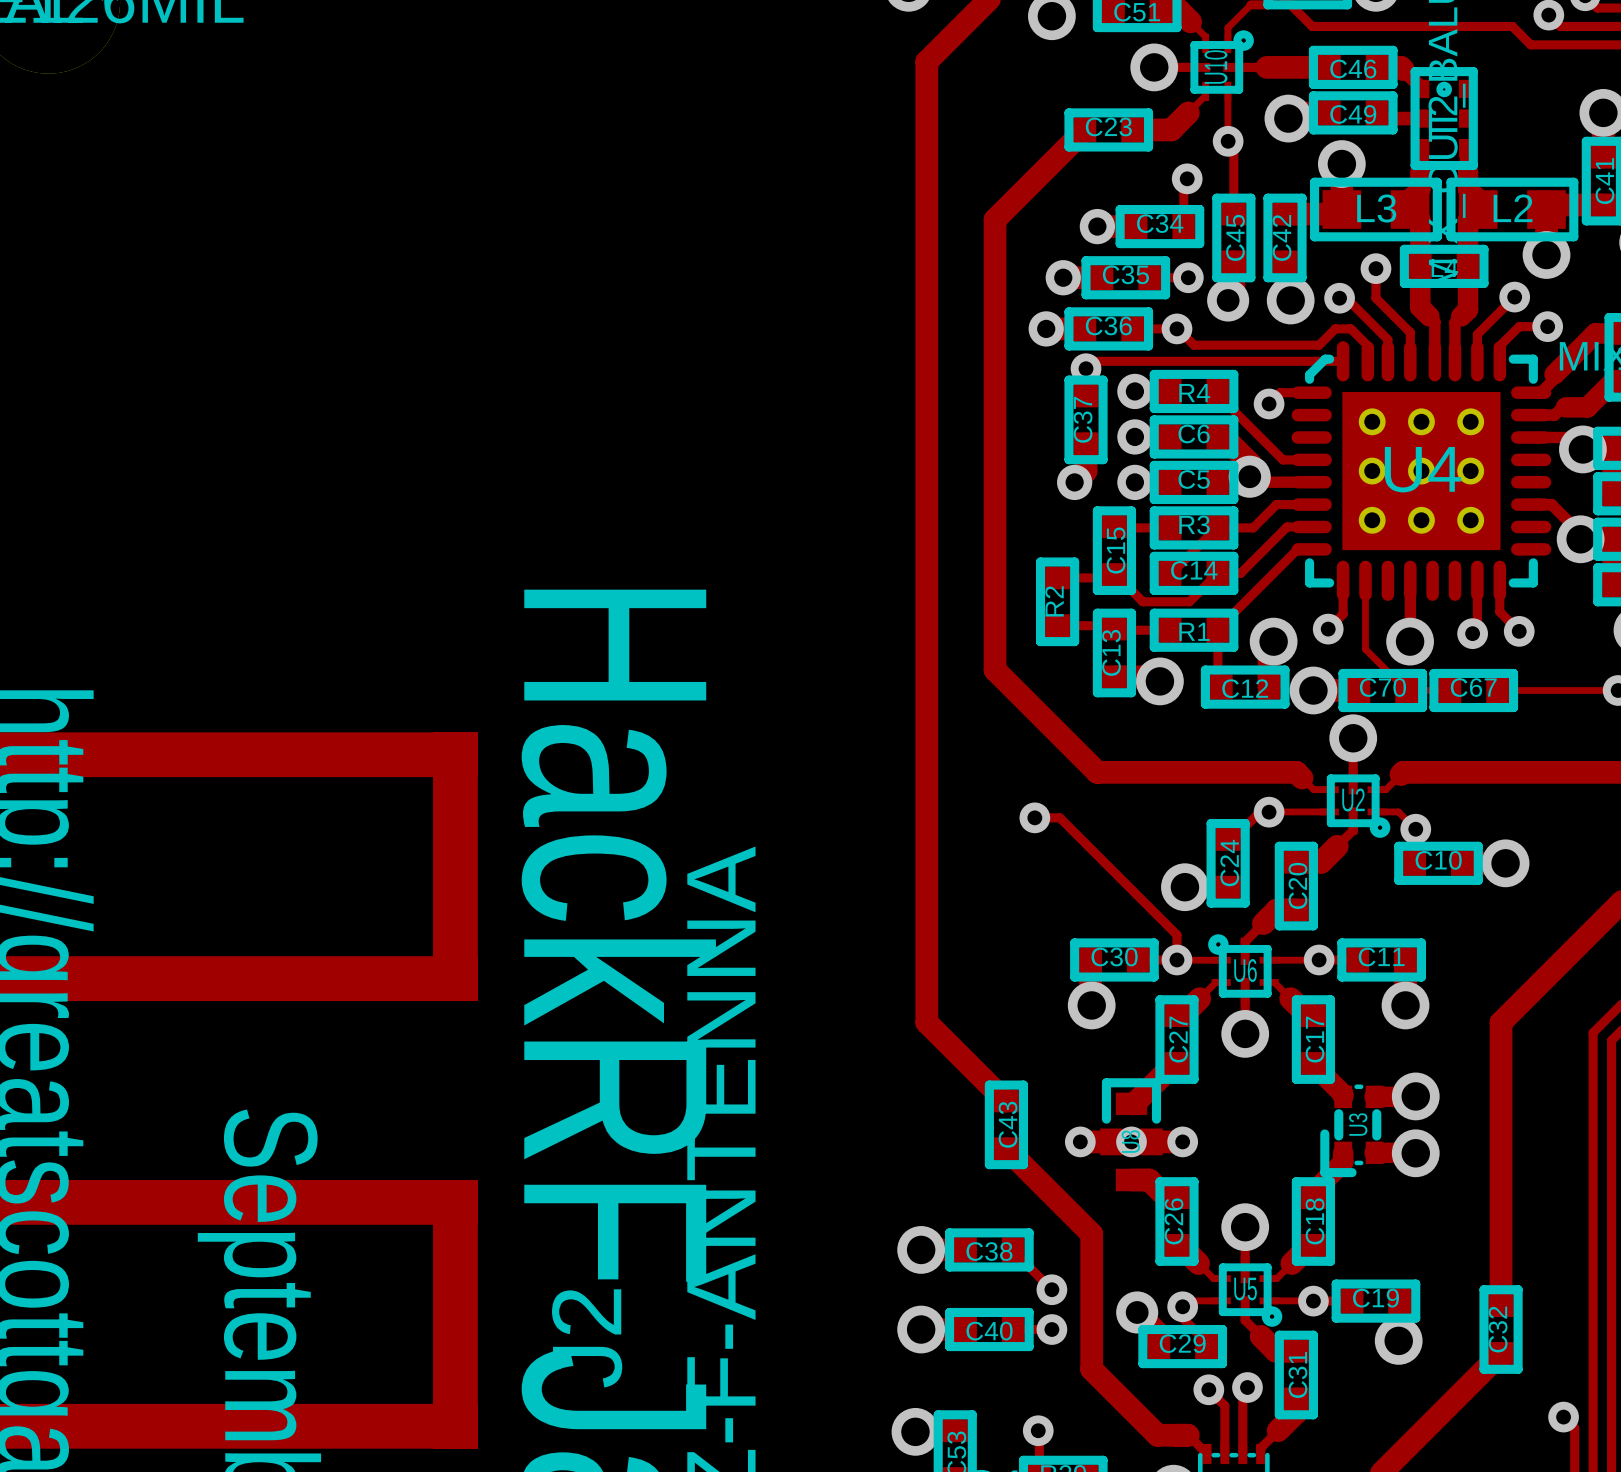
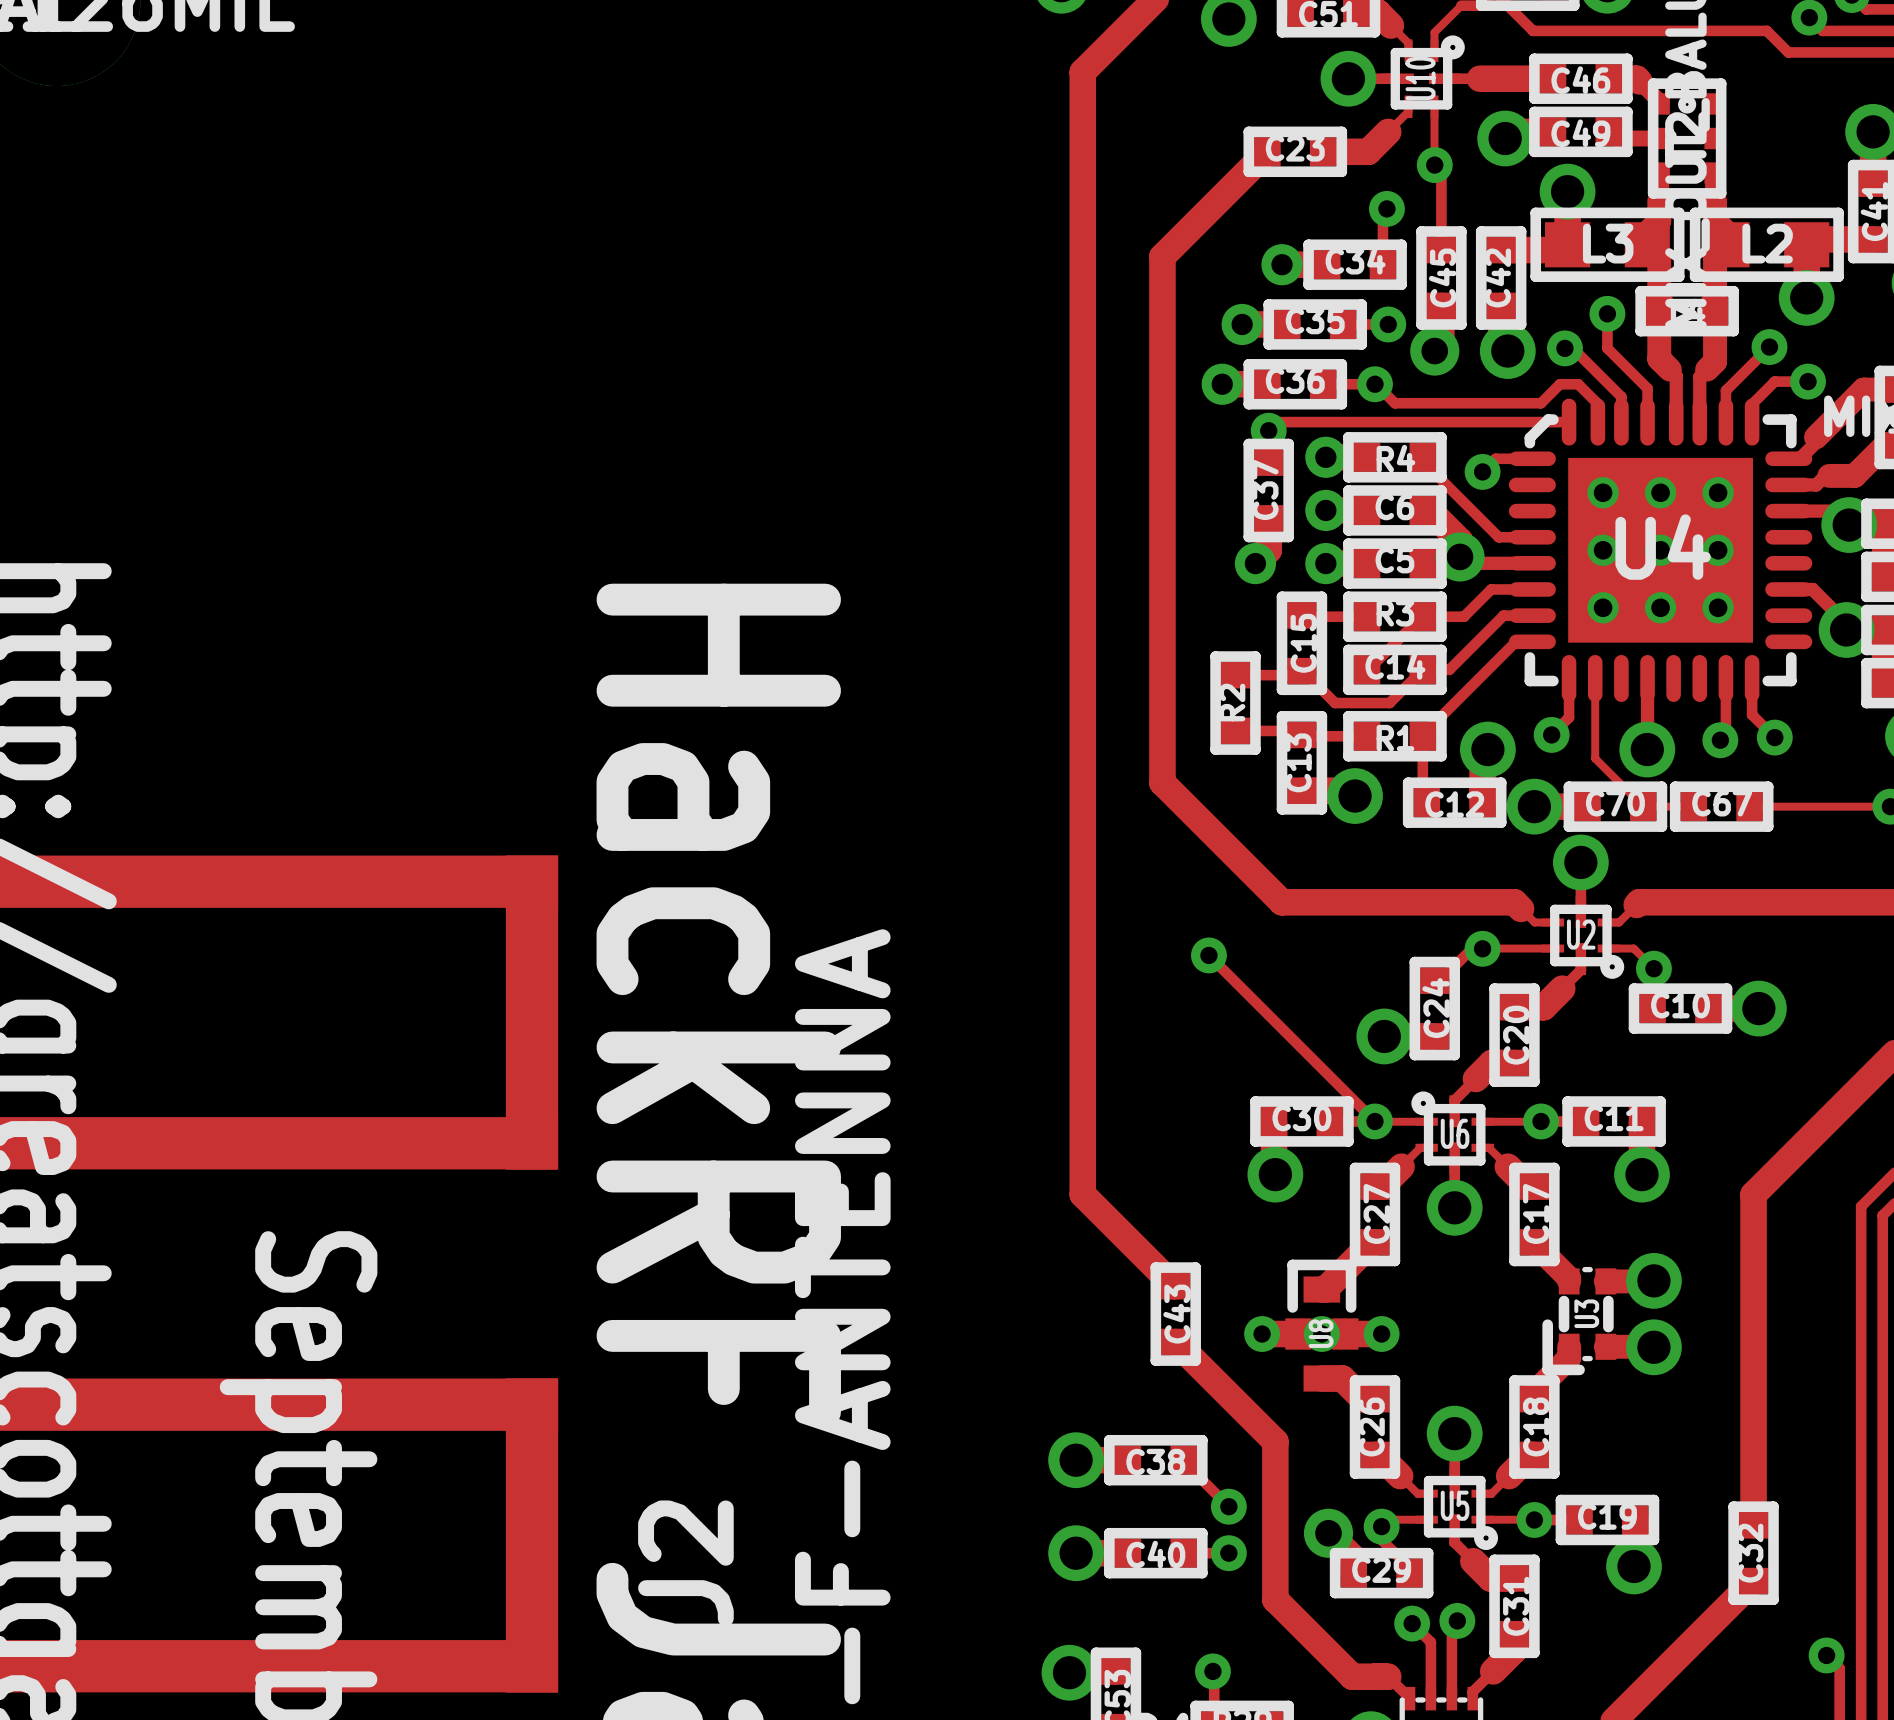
track: (1034, 817) (1059, 817) (1176, 934) (1176, 959) -> (1208, 955) (1374, 1121)

